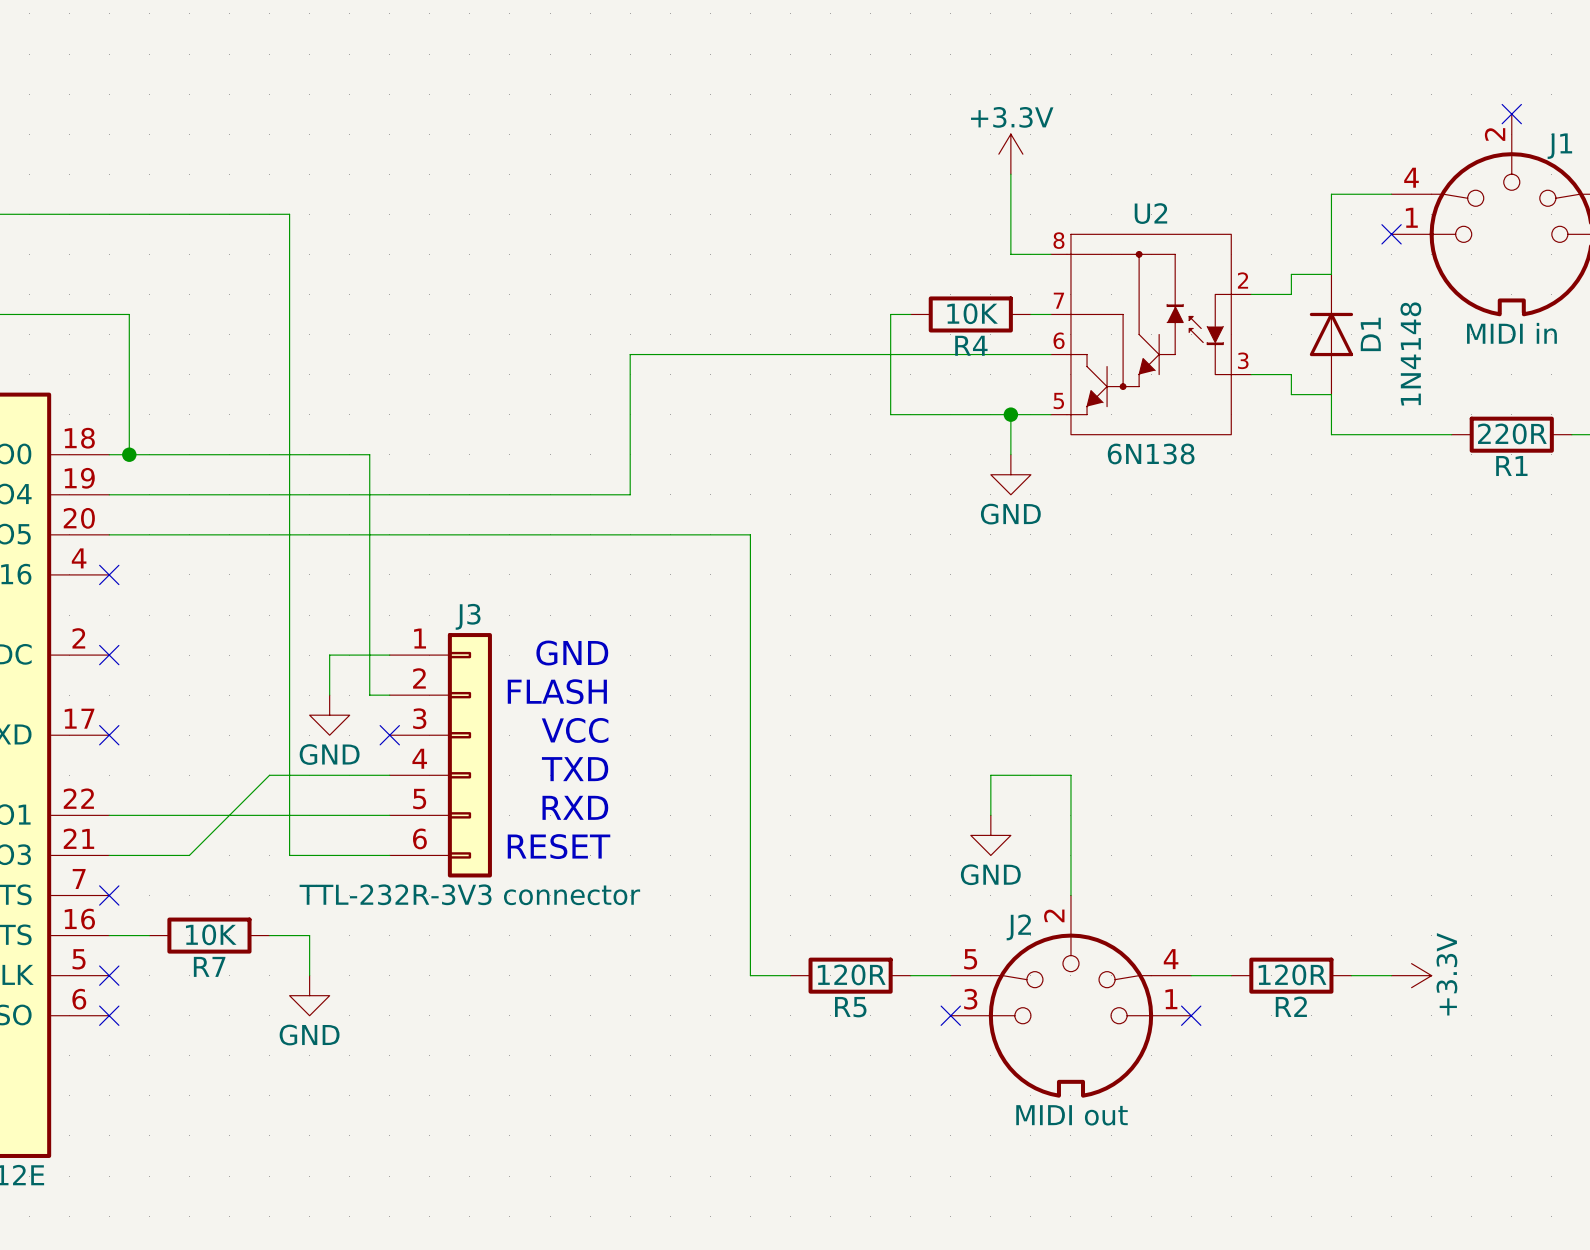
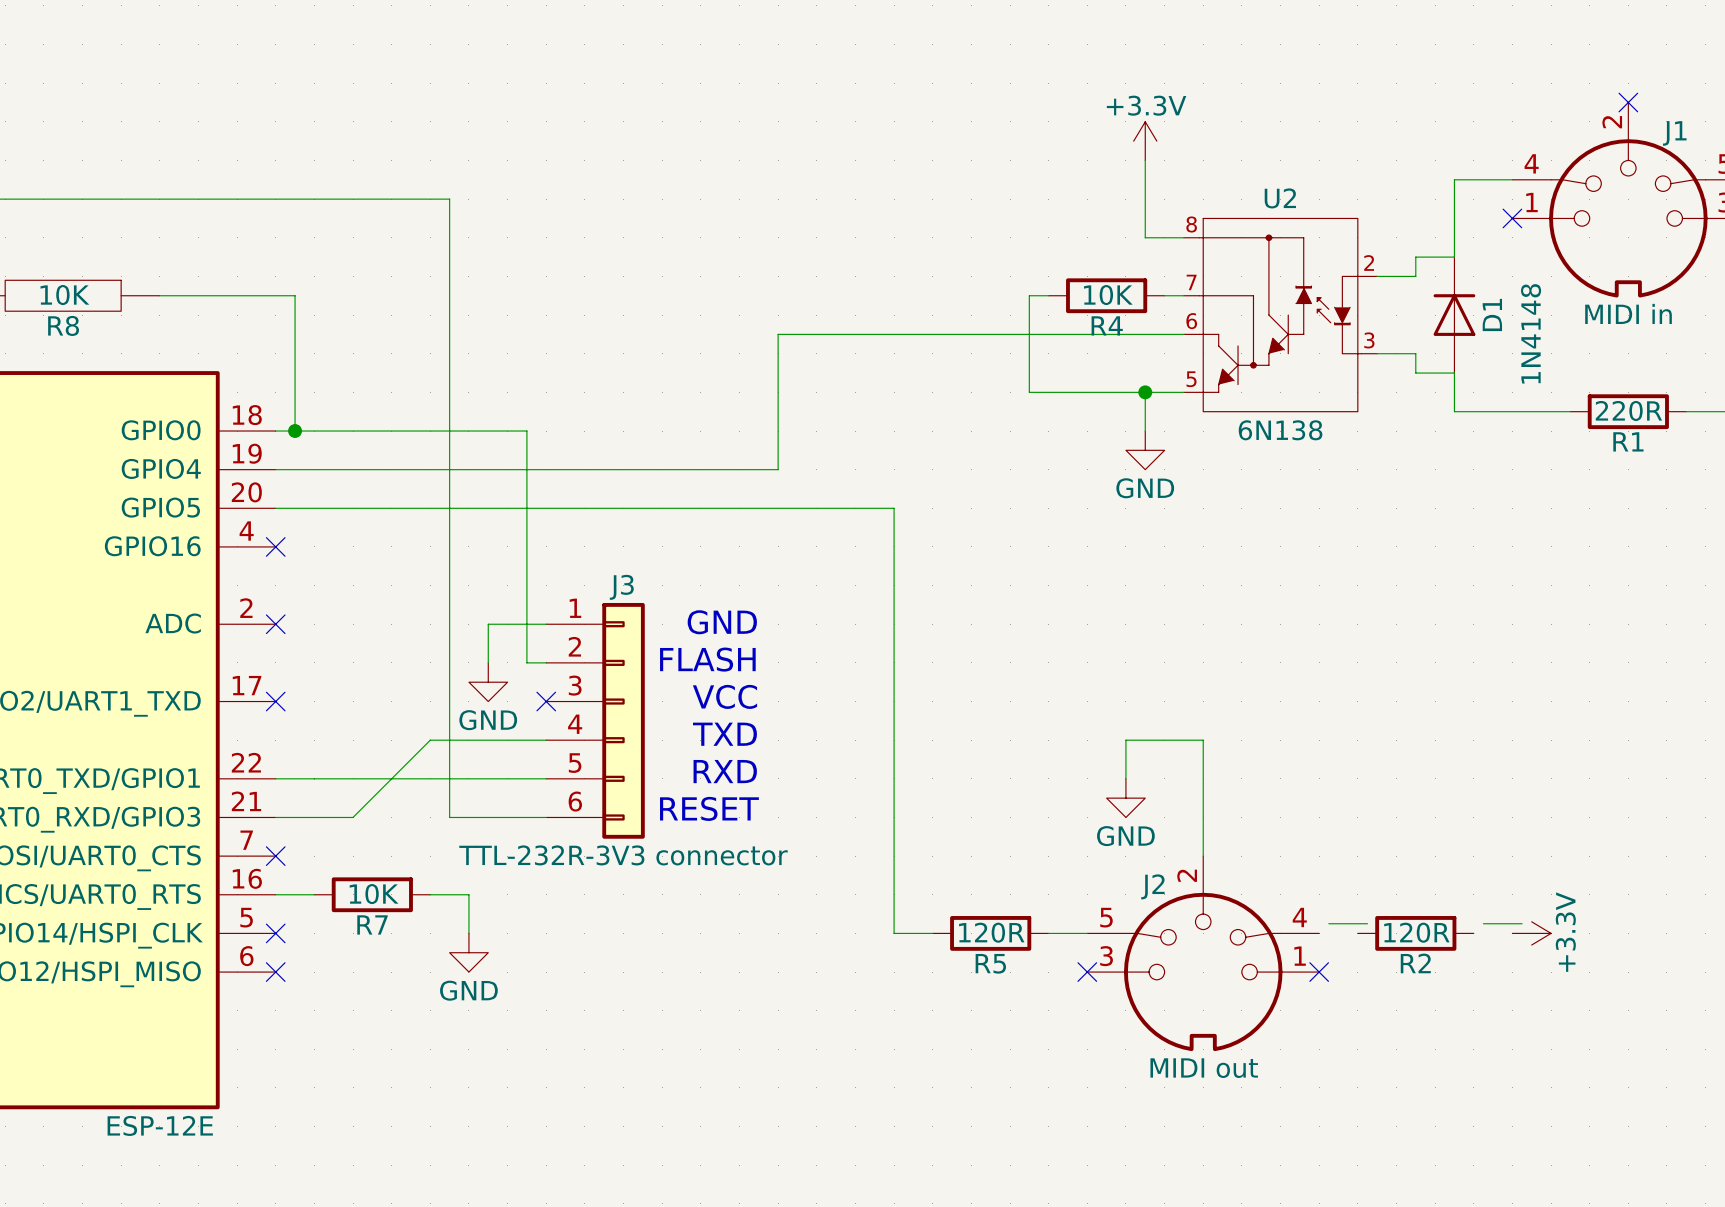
wire: (1191, 975) (1231, 975) -> (1328, 923) (1367, 923)
wire: (1351, 975) (1391, 975) -> (1483, 923) (1522, 923)

